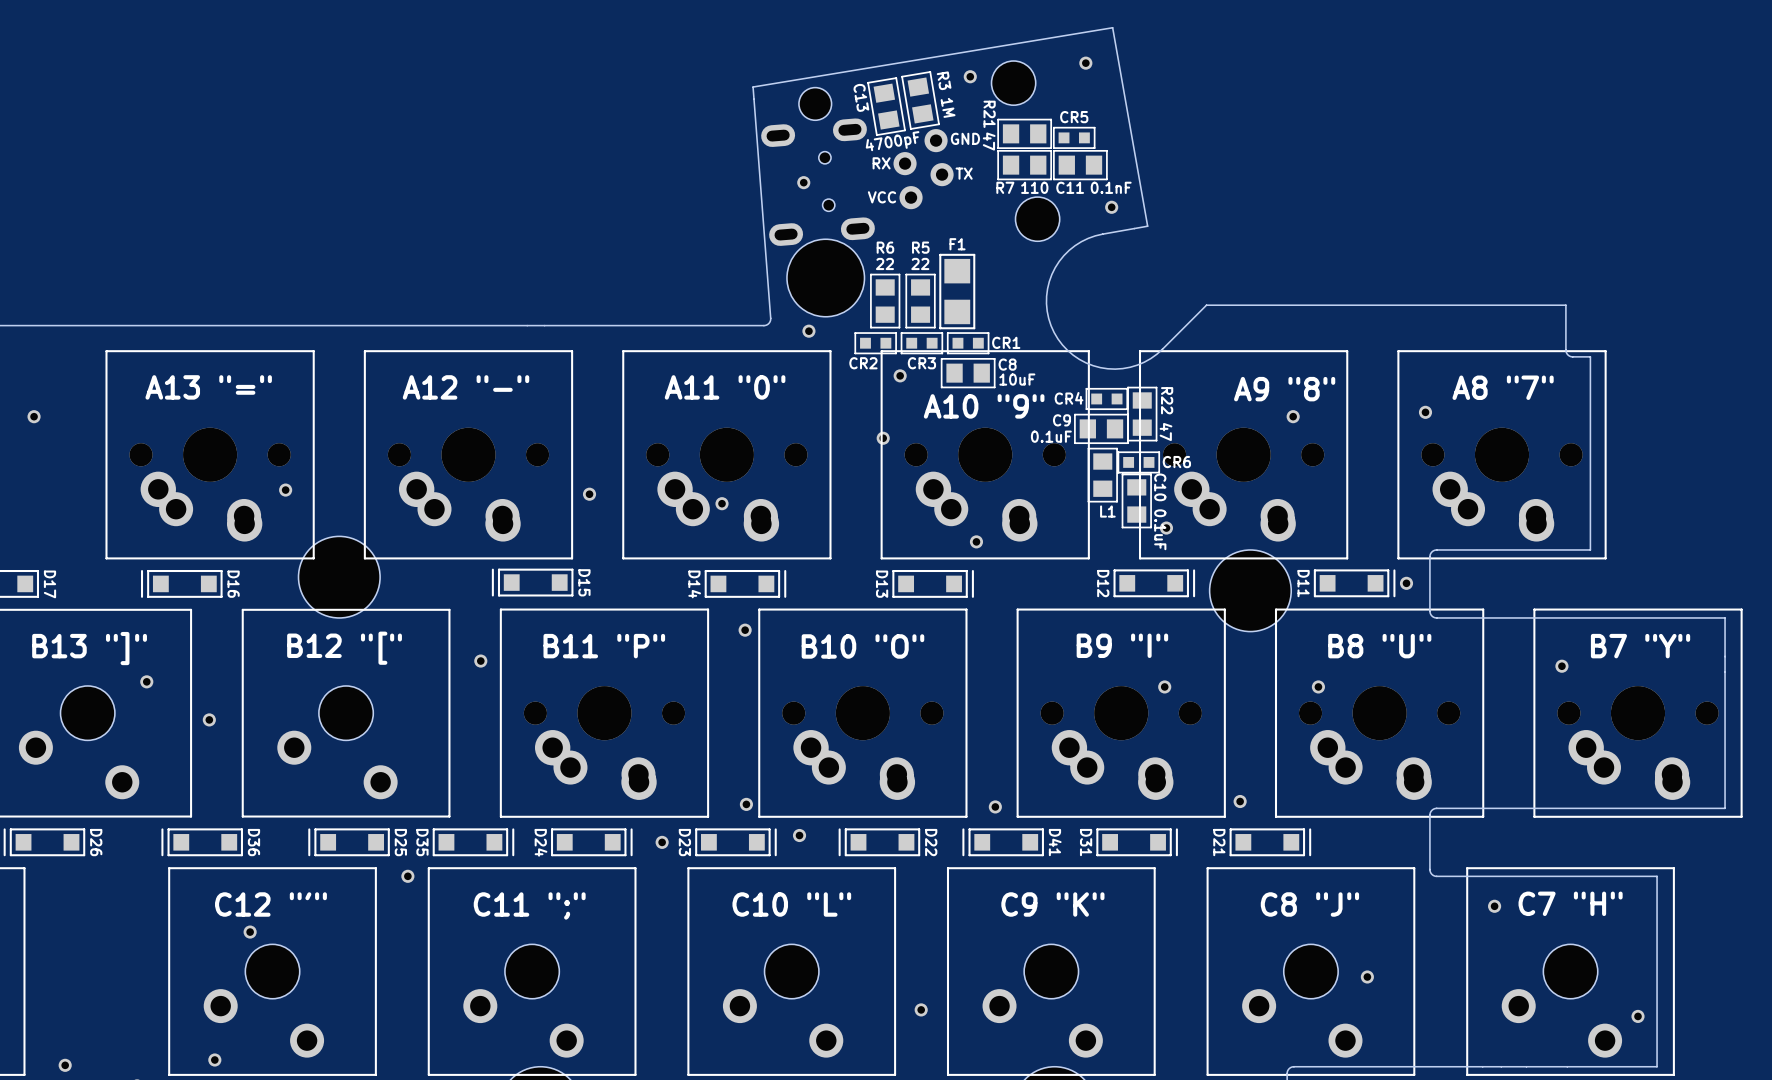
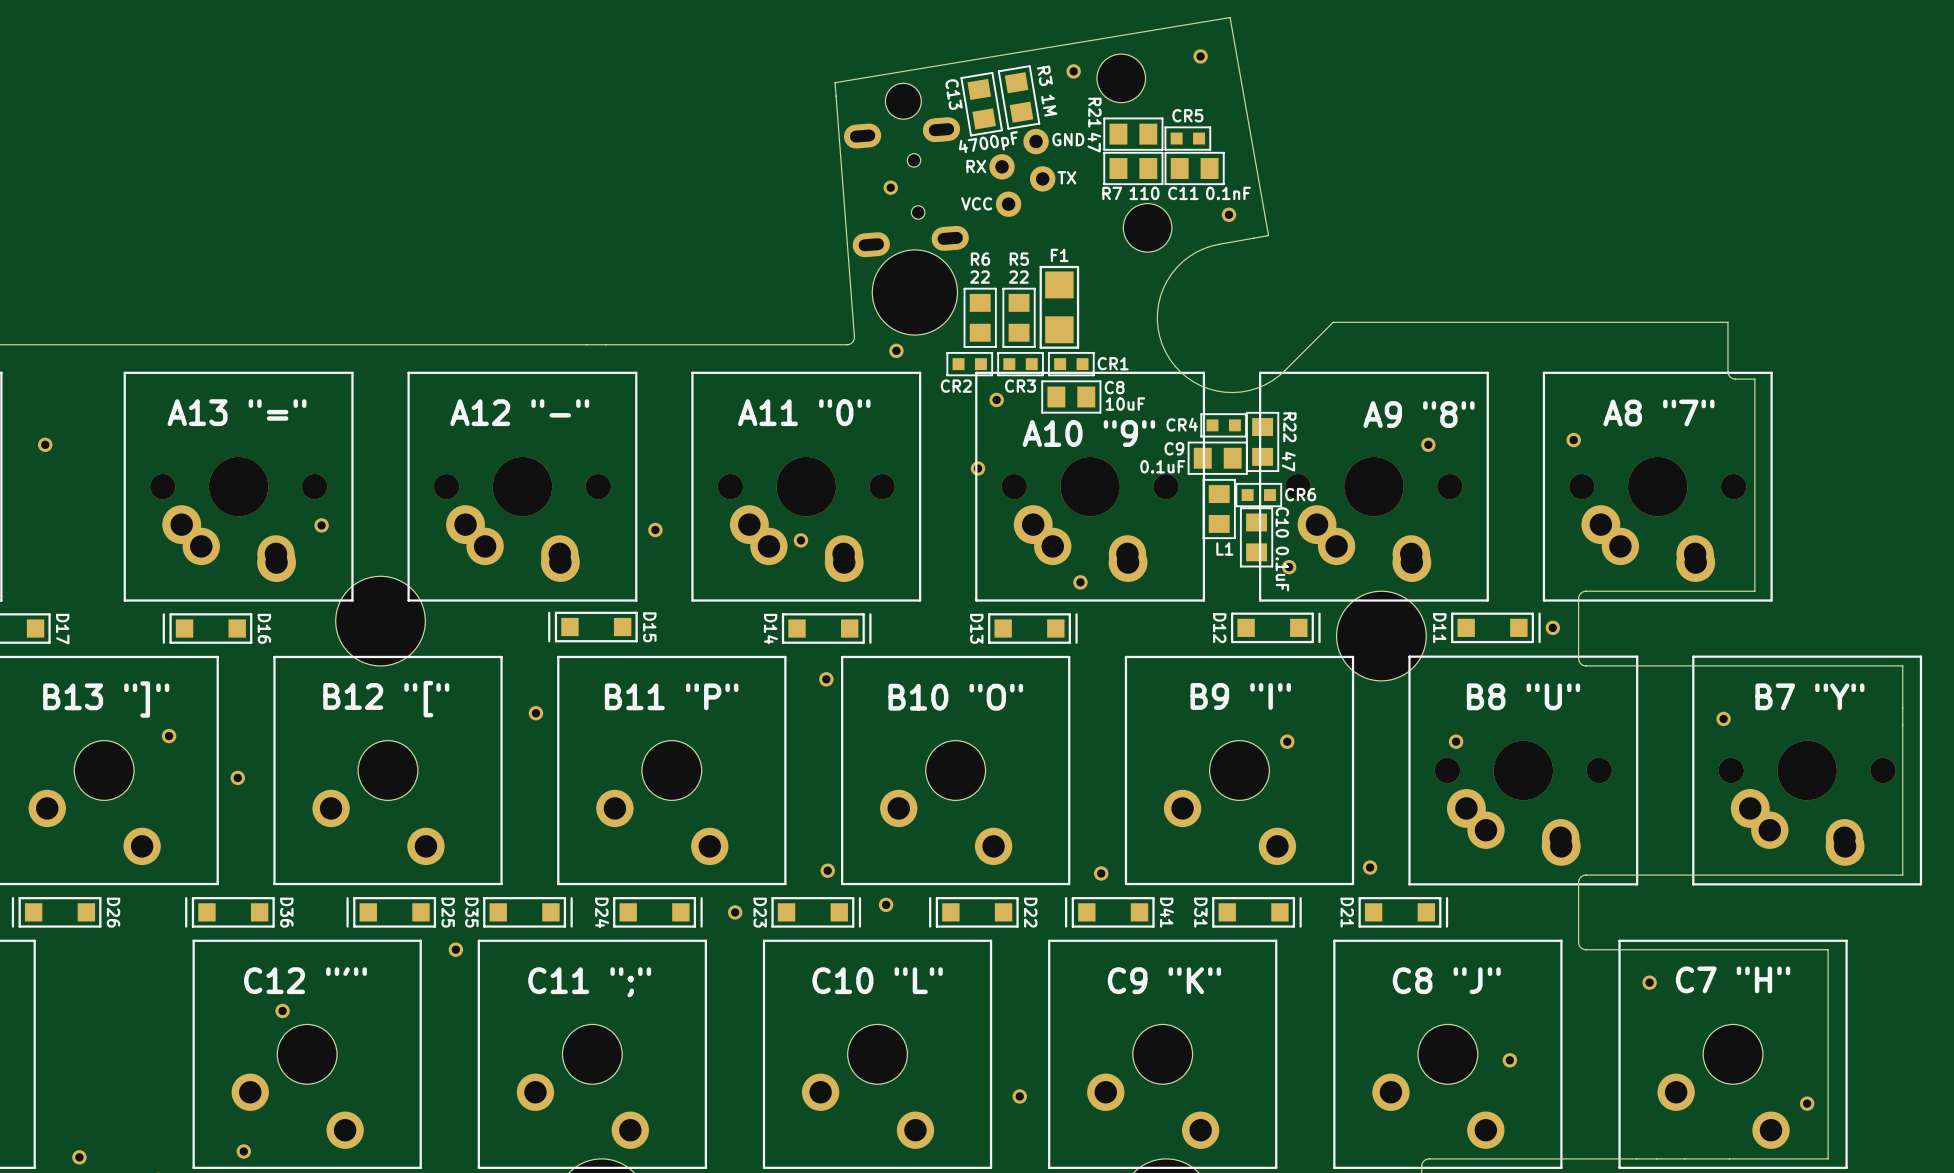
part footprint: [499, 608, 710, 818] -> [557, 655, 787, 886]
part footprint: [758, 608, 968, 818] -> [841, 655, 1071, 886]
part footprint: [1016, 608, 1226, 818] -> [1124, 655, 1355, 886]

